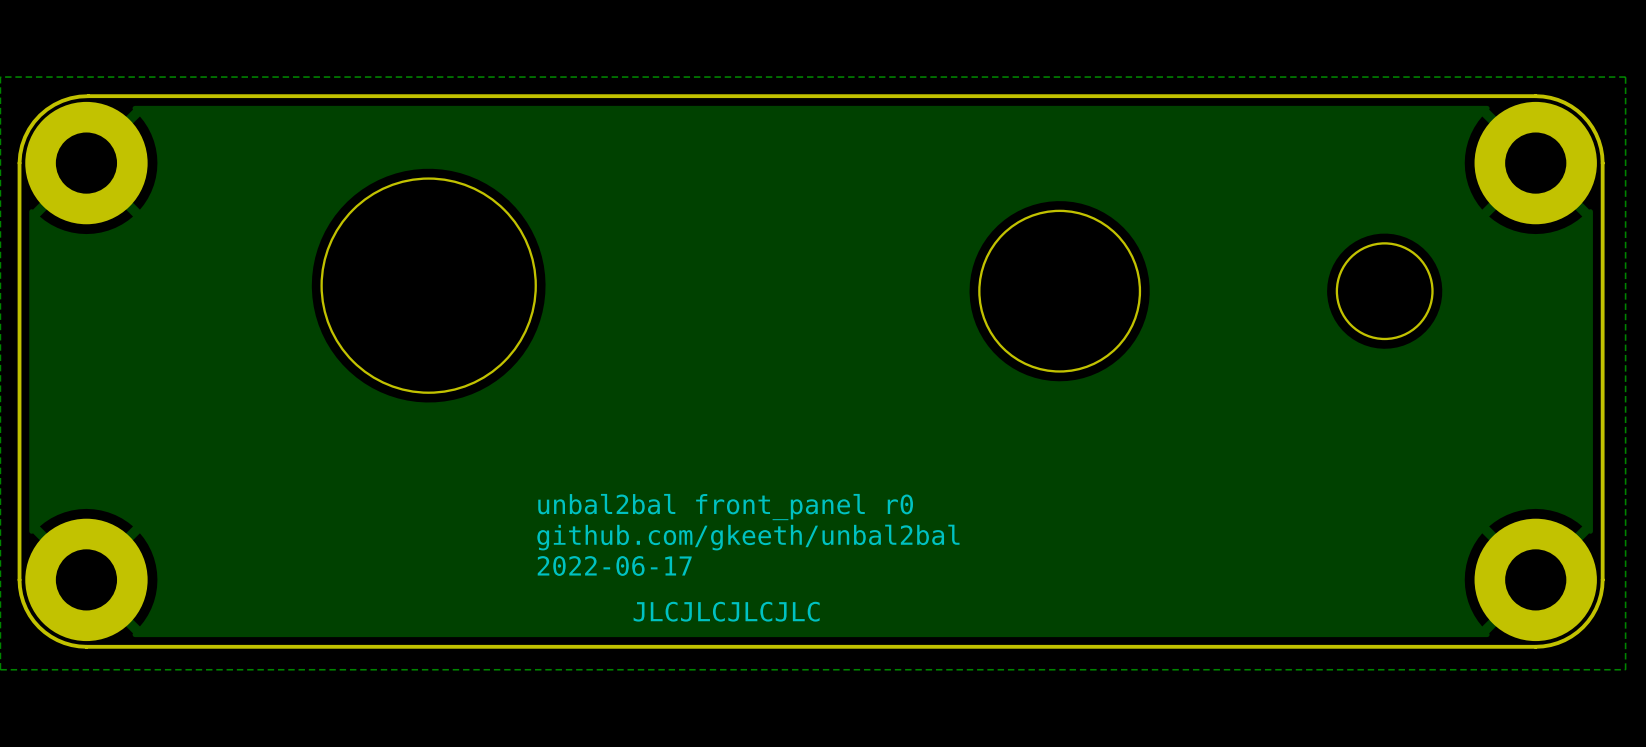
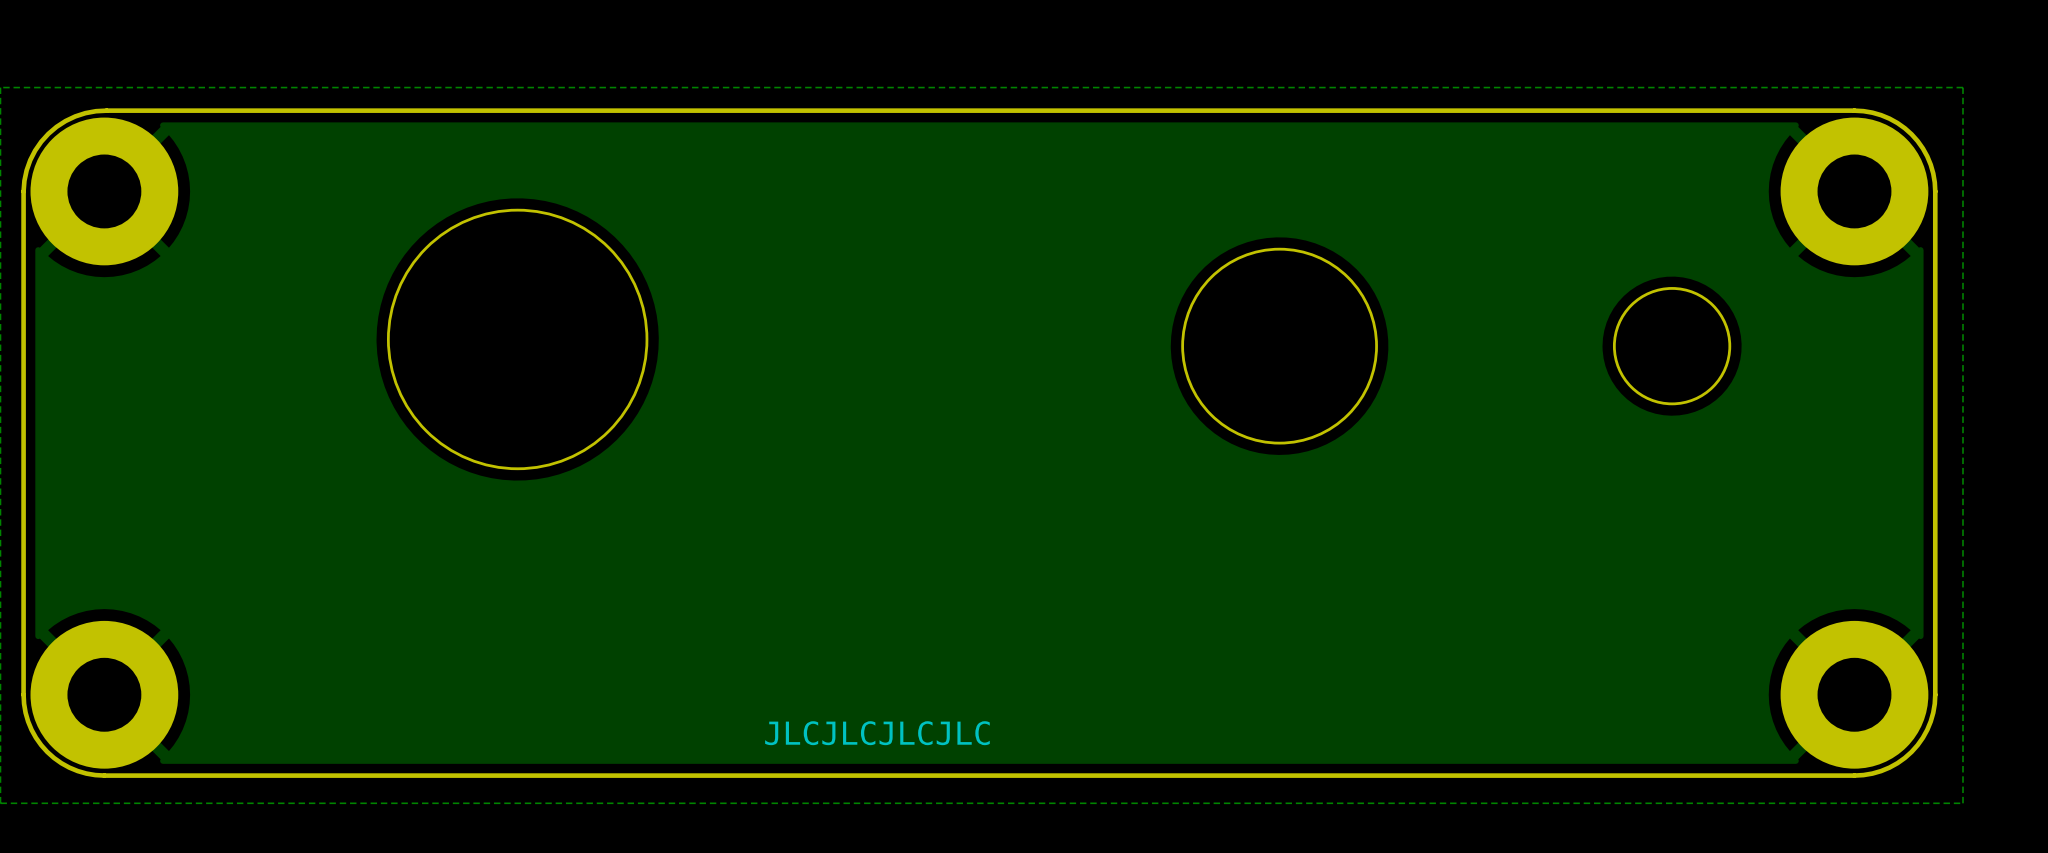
text: unbal2bal front_panel r0 (725, 507) -> none
text: github.com/gkeeth/unbal2bal (748, 537) -> none
text: 2022-06-17 (614, 566) -> none

